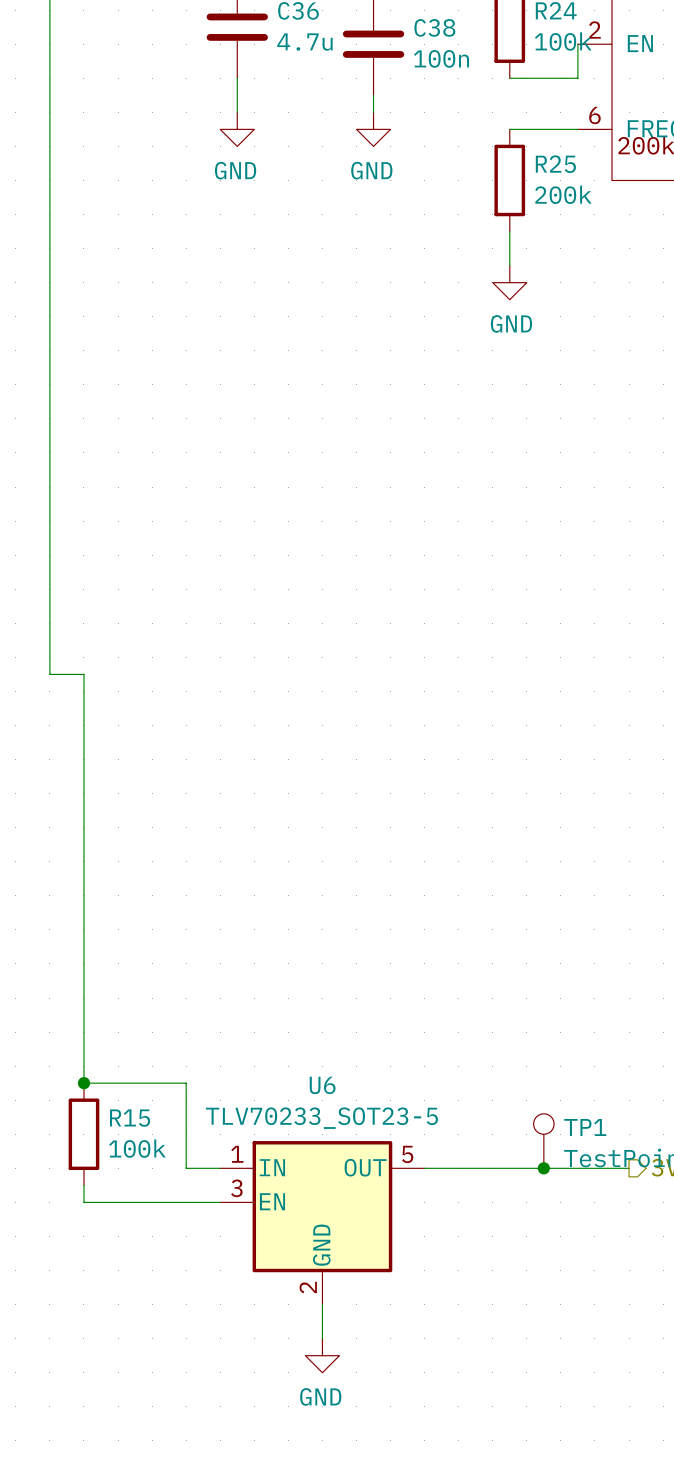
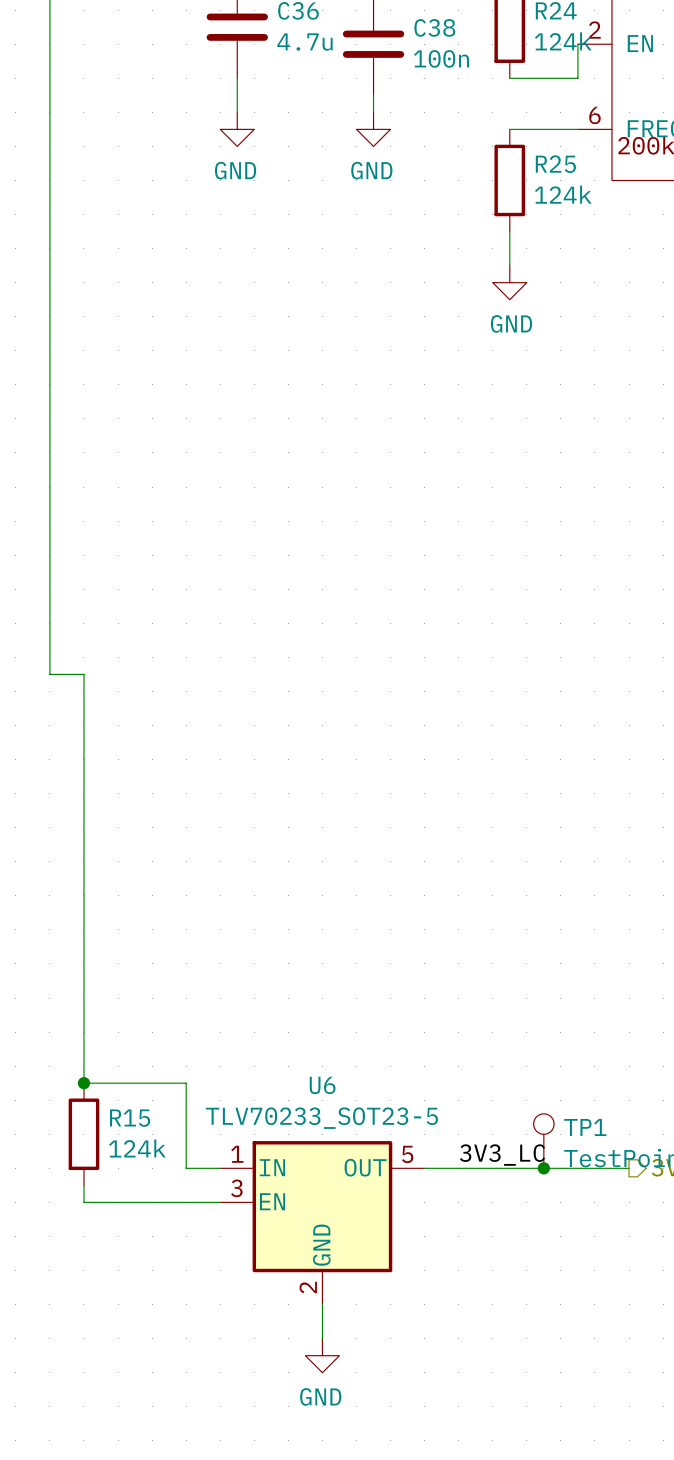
R24 value: 100k (563, 41) -> 124k (563, 41)
R25 value: 200k (563, 194) -> 124k (563, 194)
R15 value: 100k (137, 1148) -> 124k (137, 1148)
label: none -> 3V3_LC (502, 1155)

